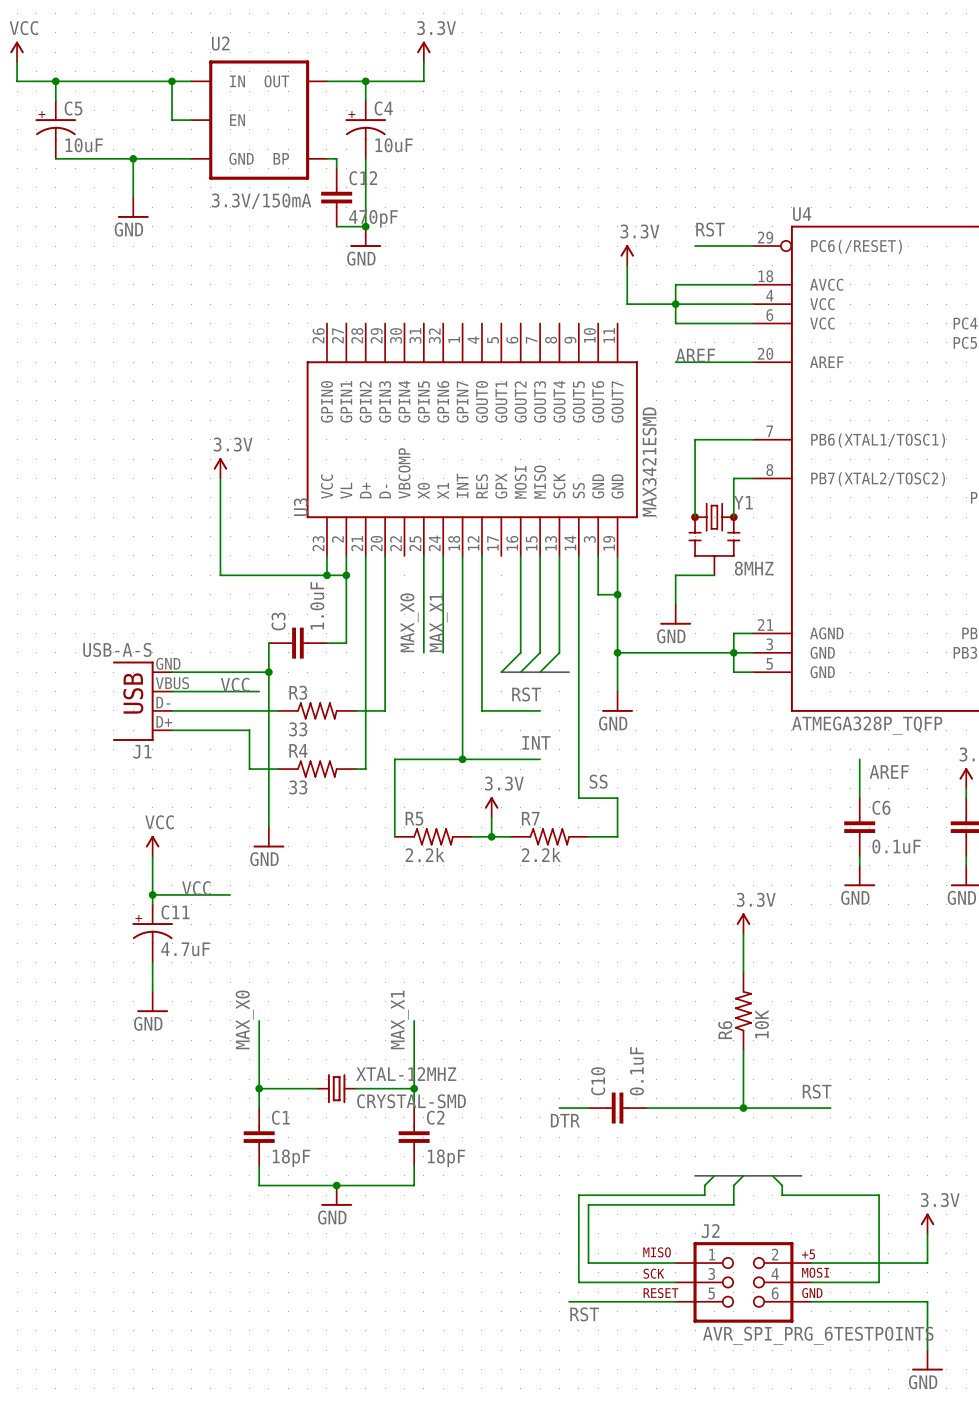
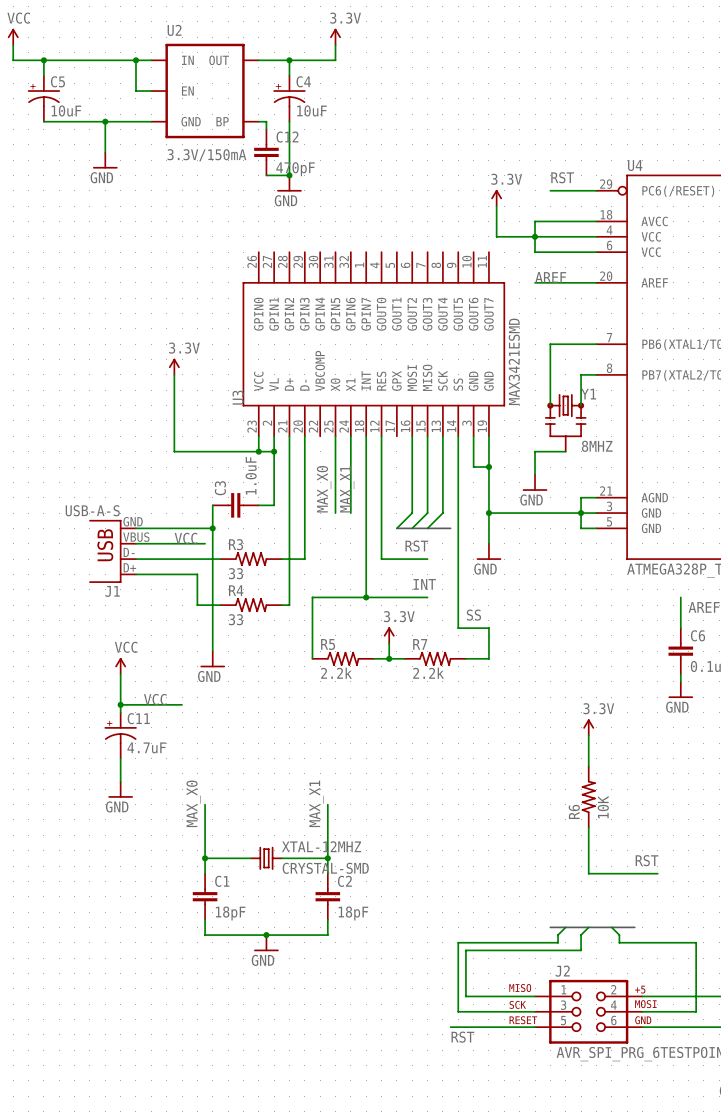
wire: (559, 1108) (588, 1108) -> none
C10: 0.1uF (617, 1108) -> none
wire: (646, 1108) (743, 1108) -> none
junction: (743, 1108) -> none
label: DTR (565, 1120) -> none

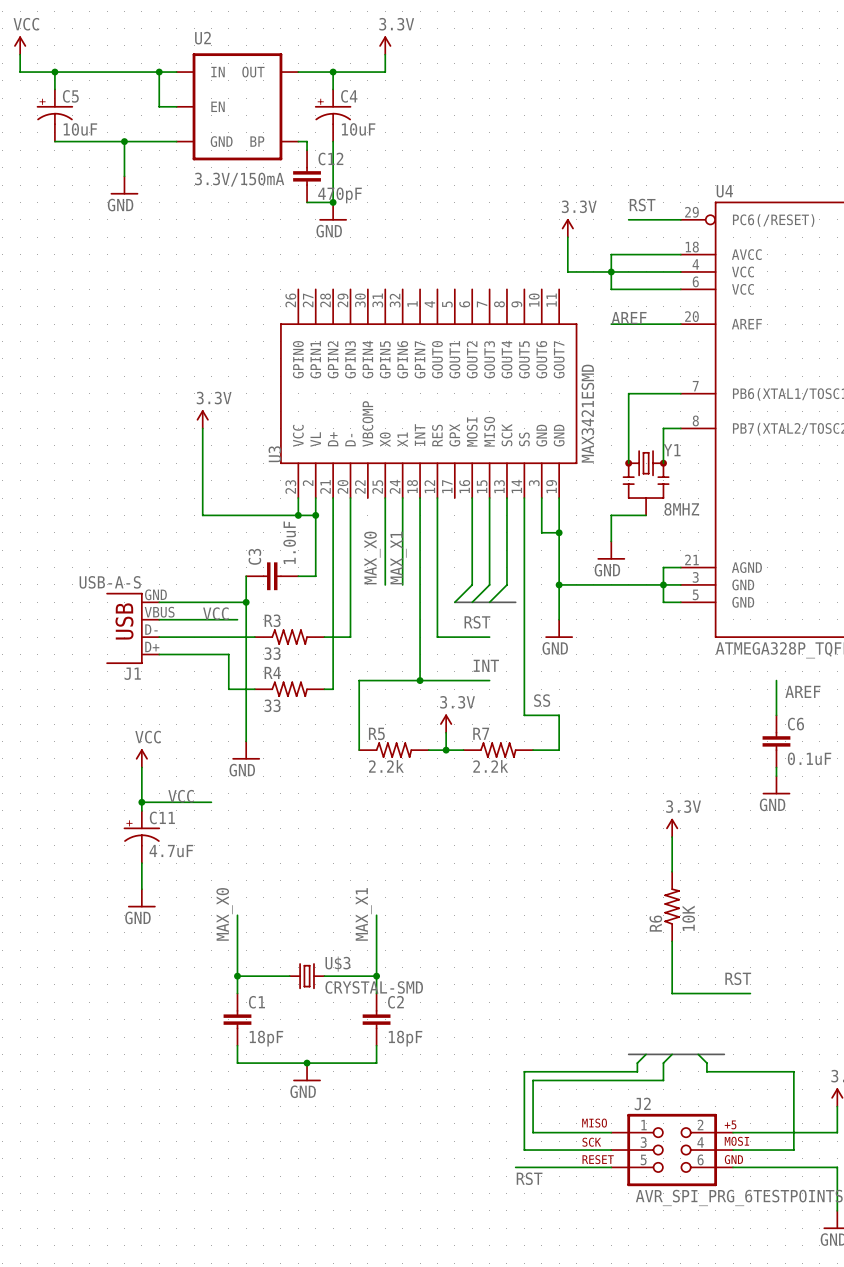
XTAL-12MHZ name: XTAL-12MHZ (321, 846) -> U$3 (337, 964)

